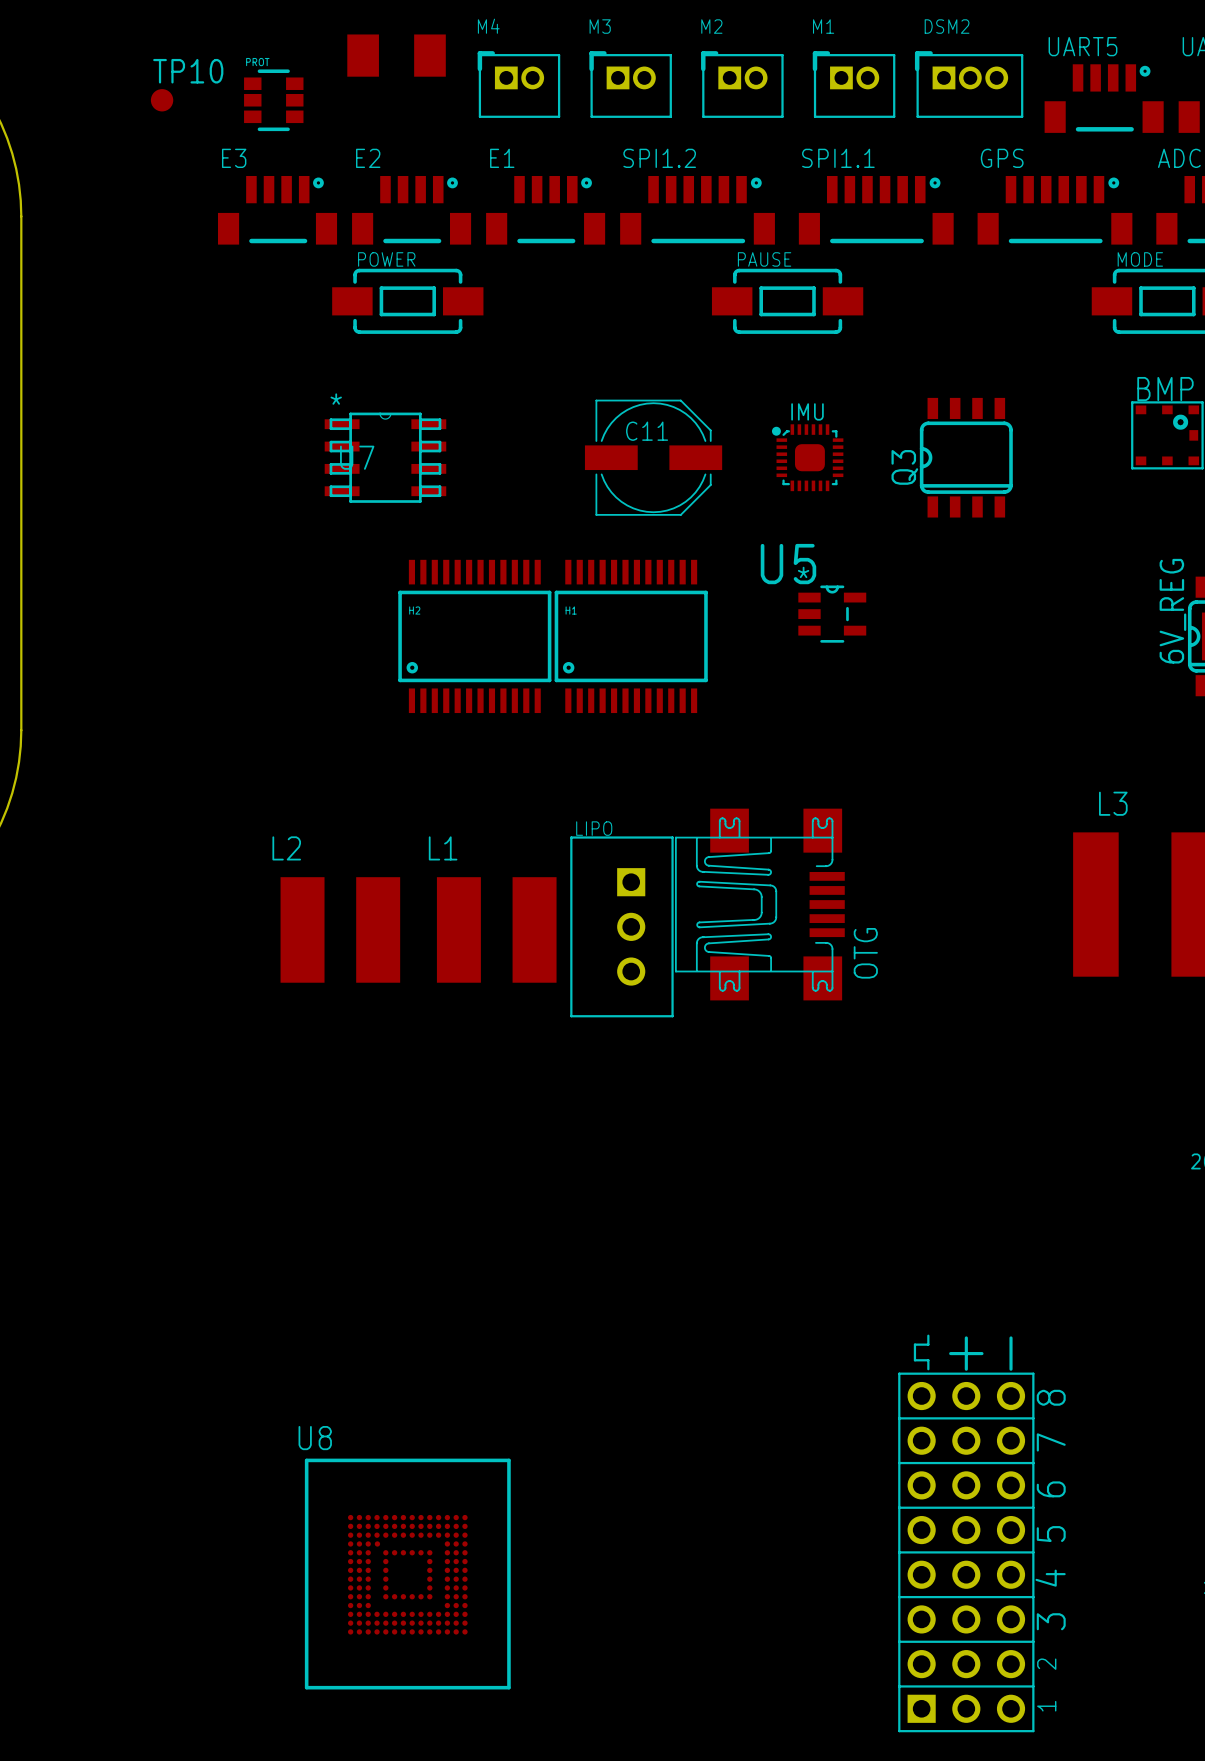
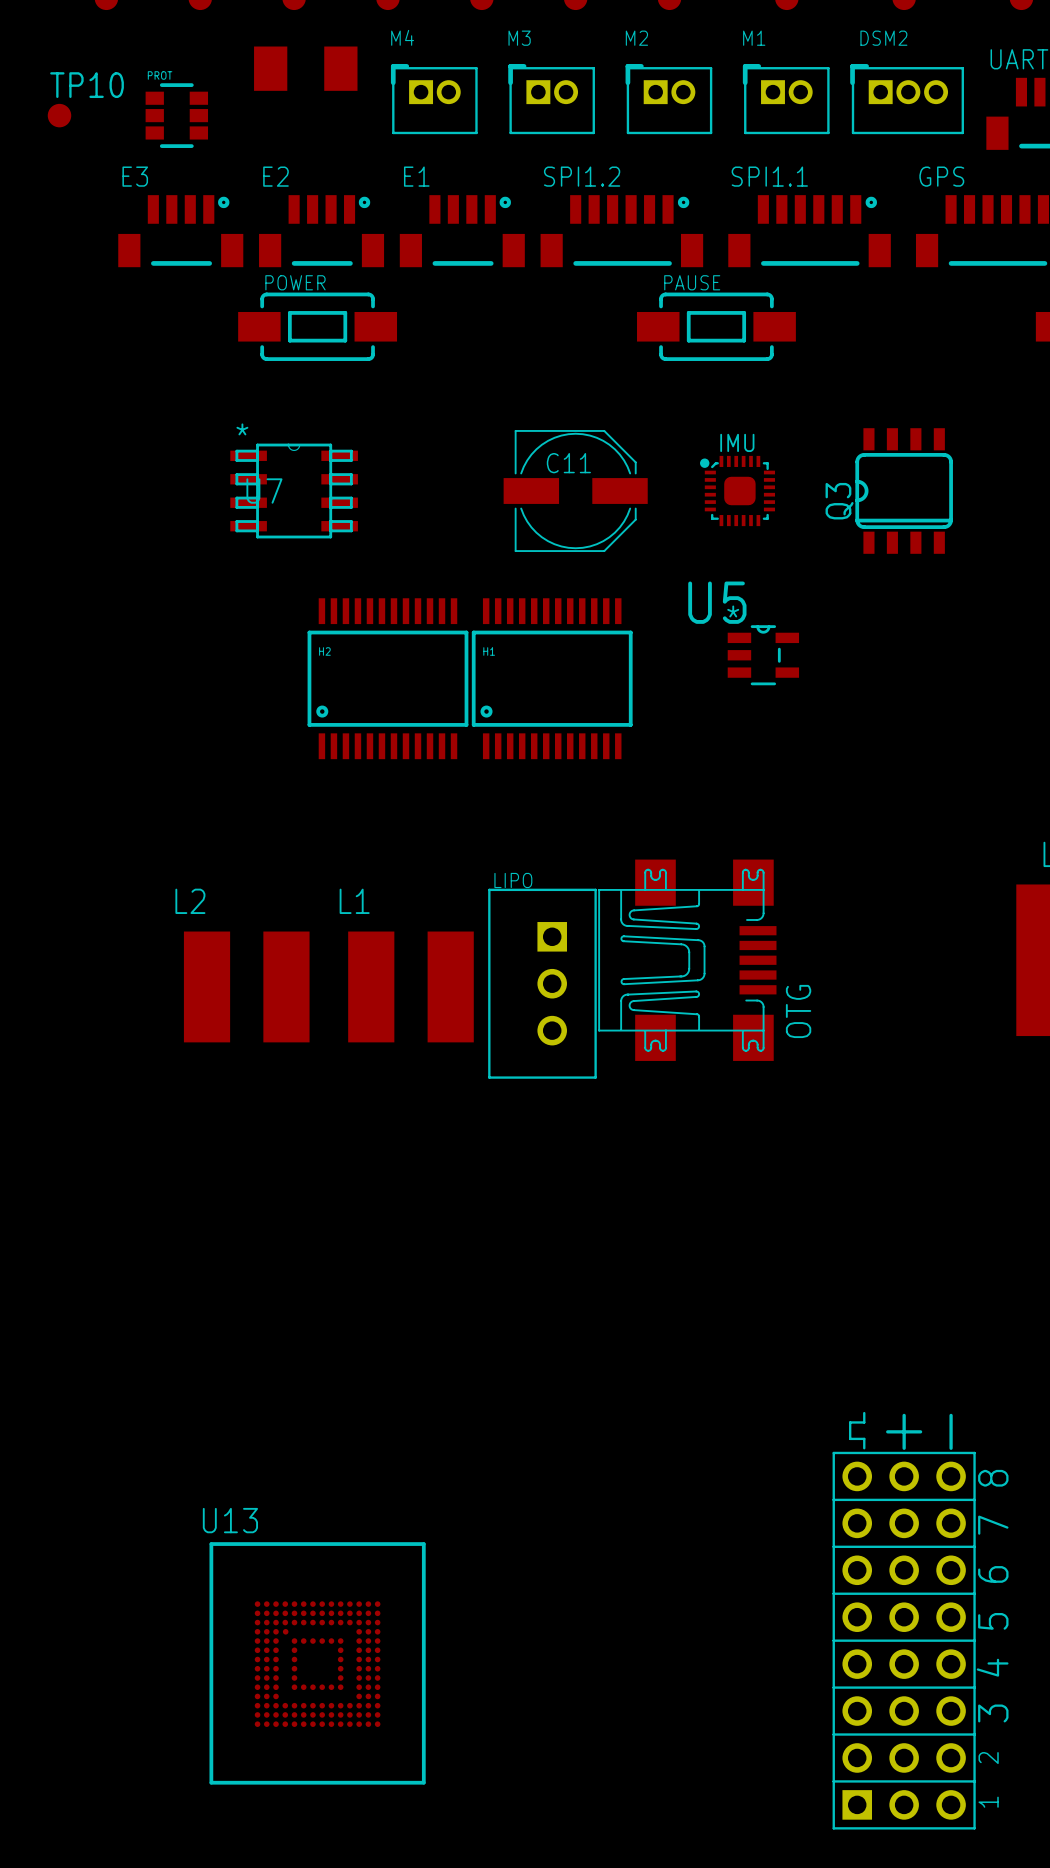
U8 name: U8 (315, 1438) -> none
U8 text: none -> U13 (230, 1520)

